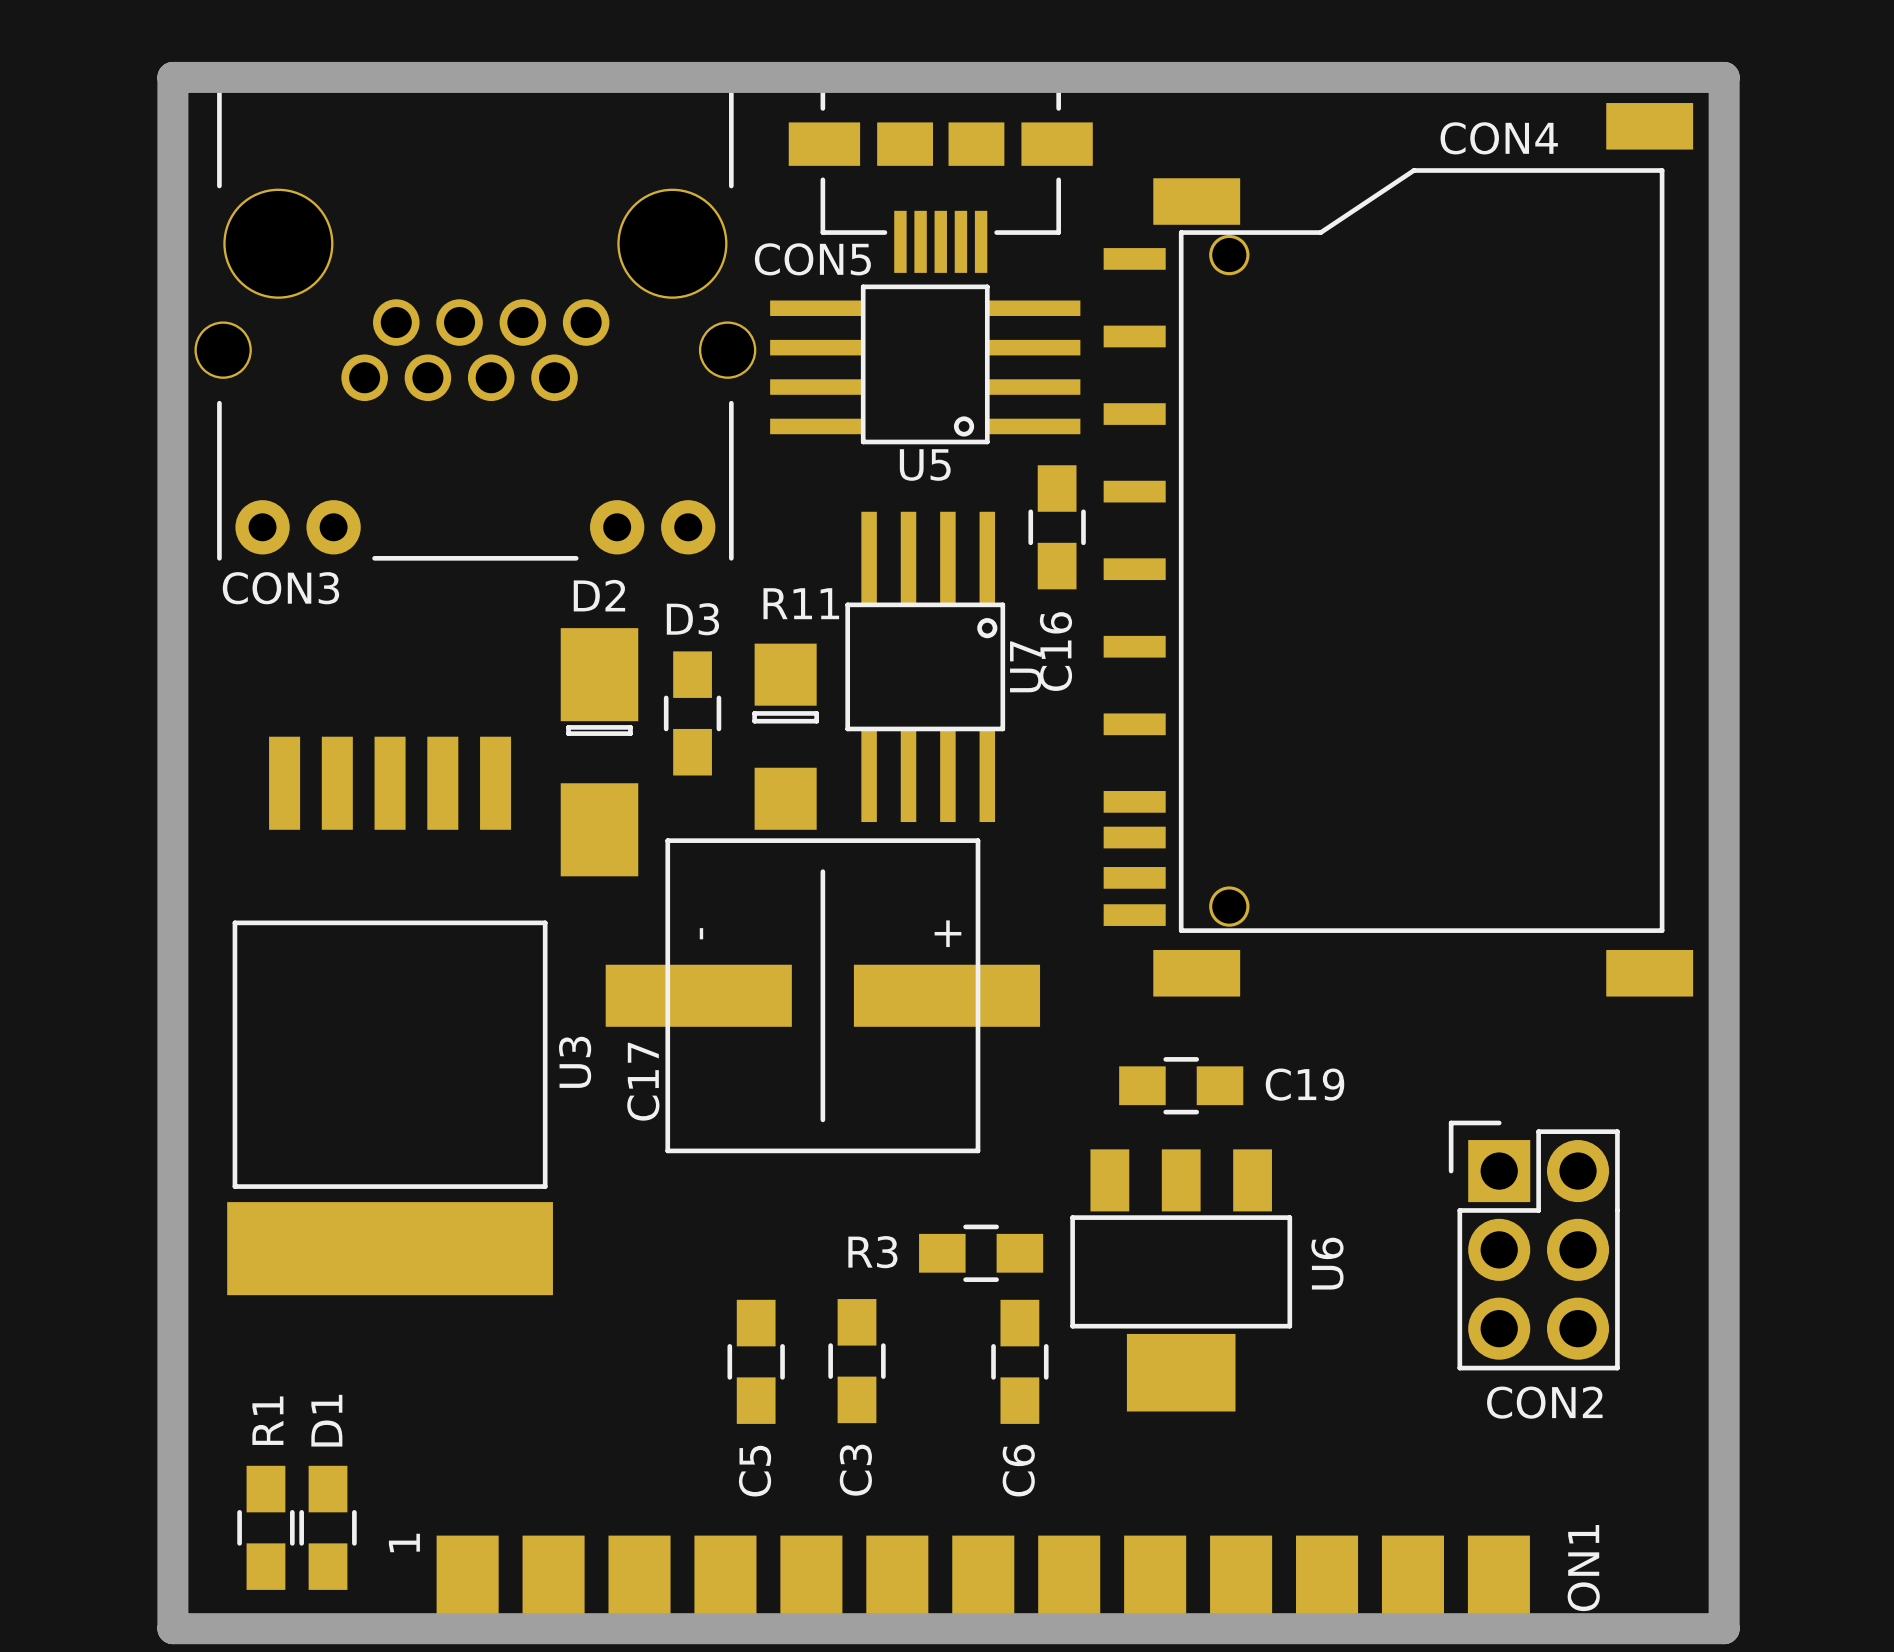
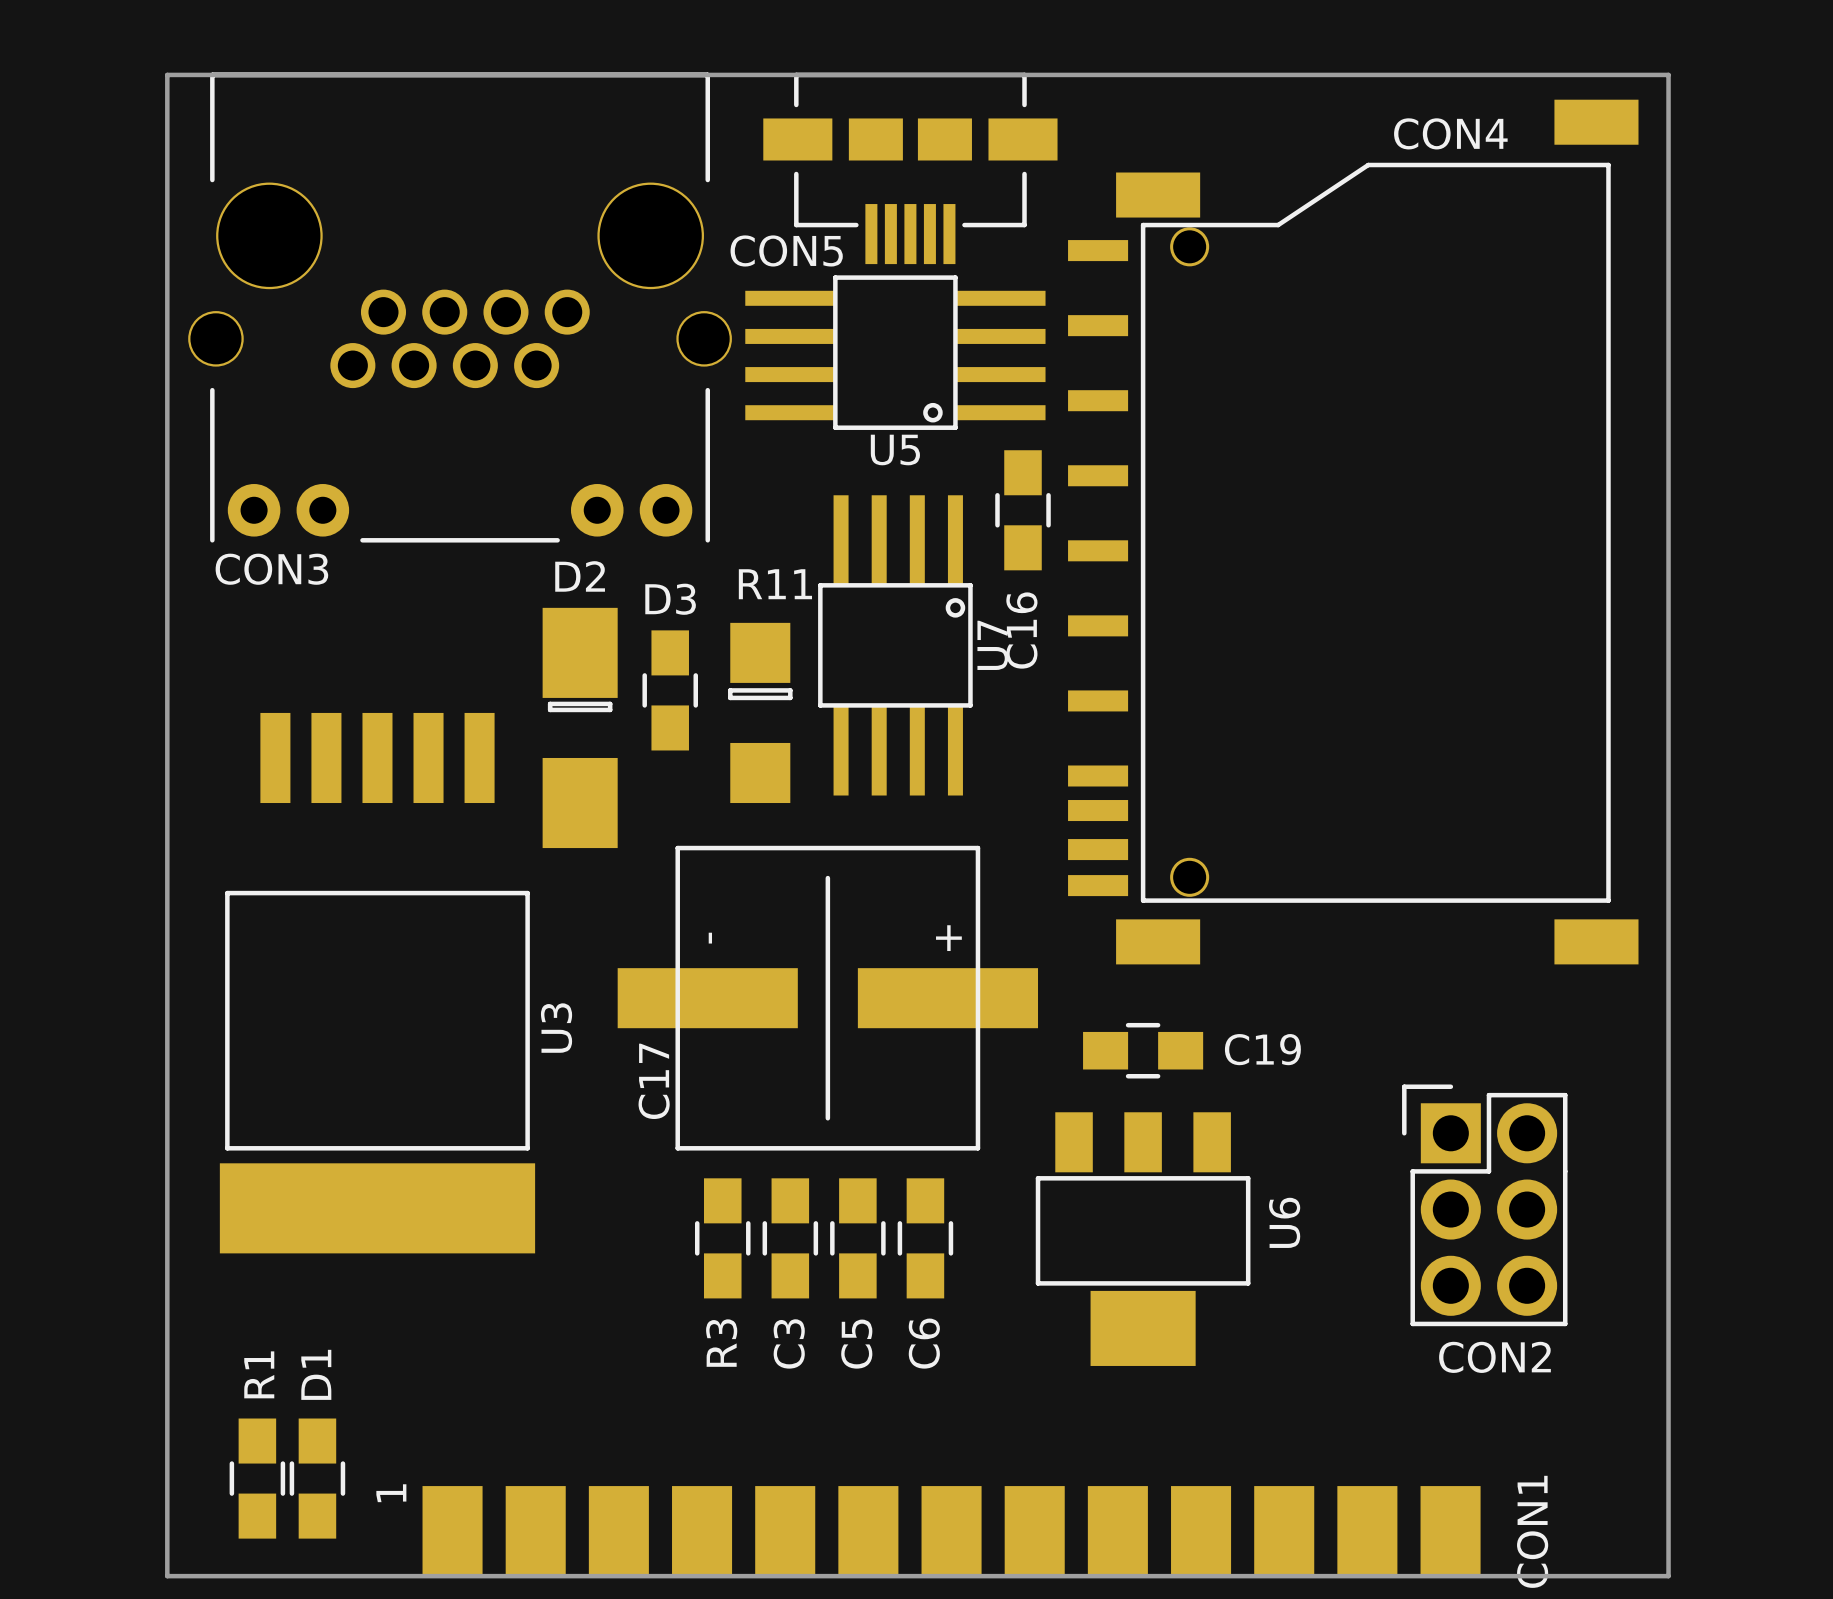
board edge width: thick (172, 77) (172, 1628) (1724, 1628) (1724, 77) (172, 77) -> thin (167, 74) (167, 1576) (1668, 1576) (1668, 74) (167, 74)
C17 position: (822, 995) -> (827, 998)
R3 name position: R3 (872, 1252) -> R3 (721, 1343)
R3 rotation: 0° (981, 1253) -> 90° clockwise (722, 1238)
R3 position: (981, 1253) -> (722, 1238)
C5 position: (756, 1361) -> (857, 1238)
C3 position: (857, 1361) -> (790, 1238)
C6 position: (1019, 1361) -> (925, 1238)

